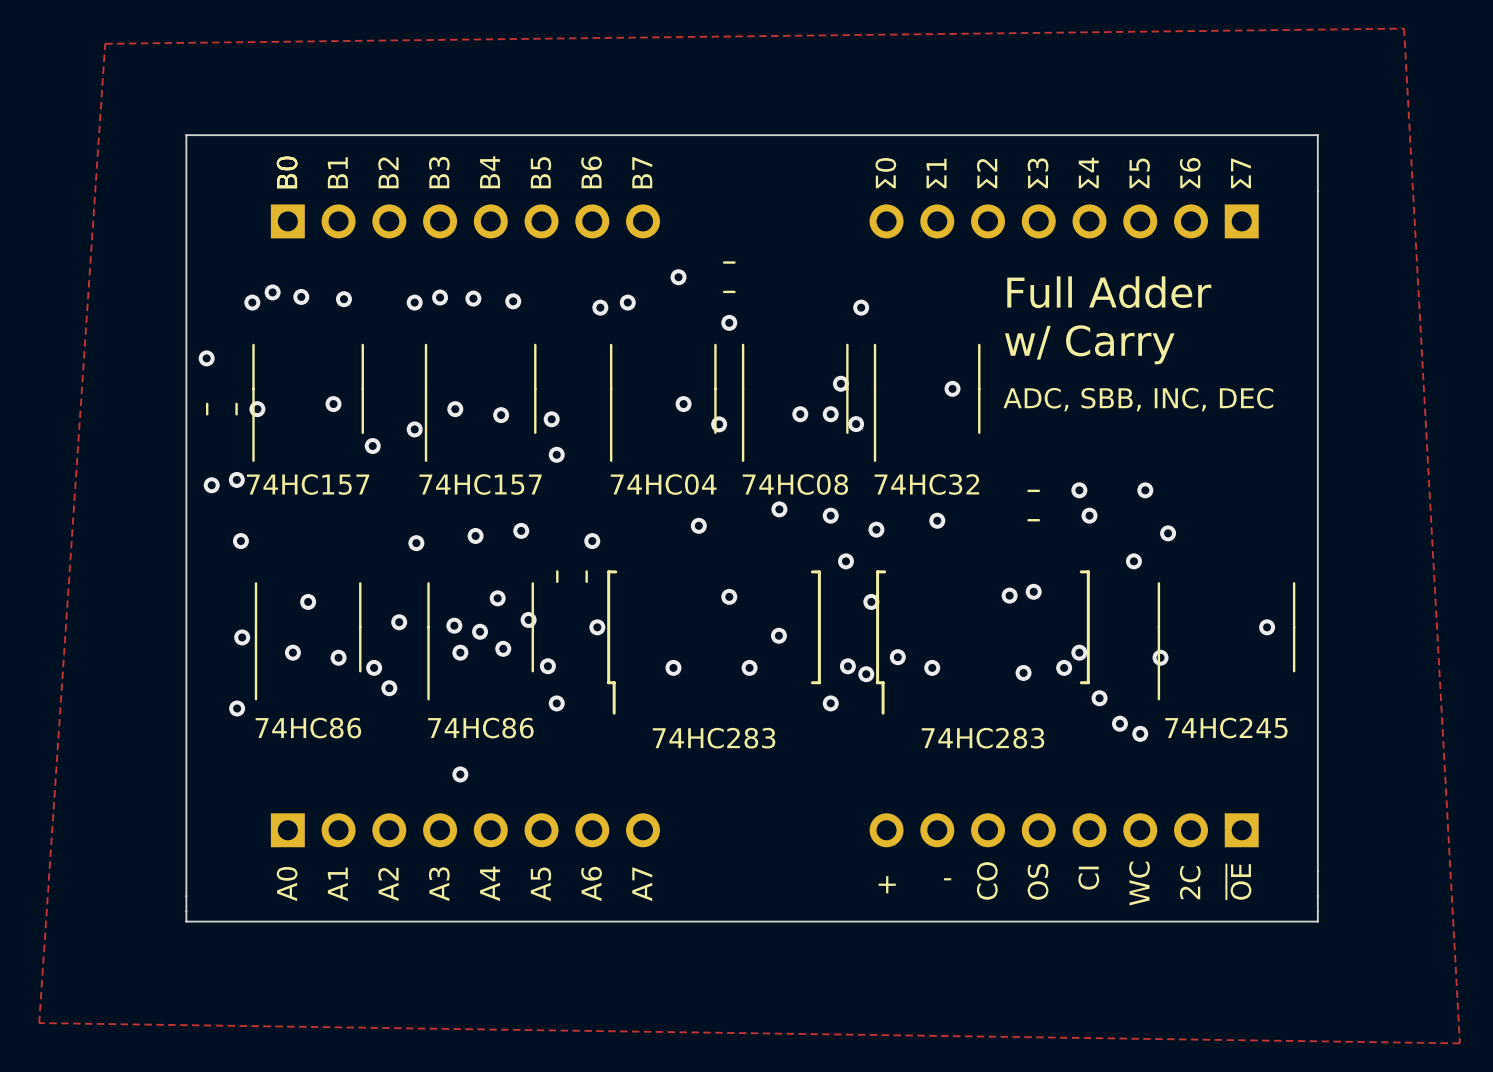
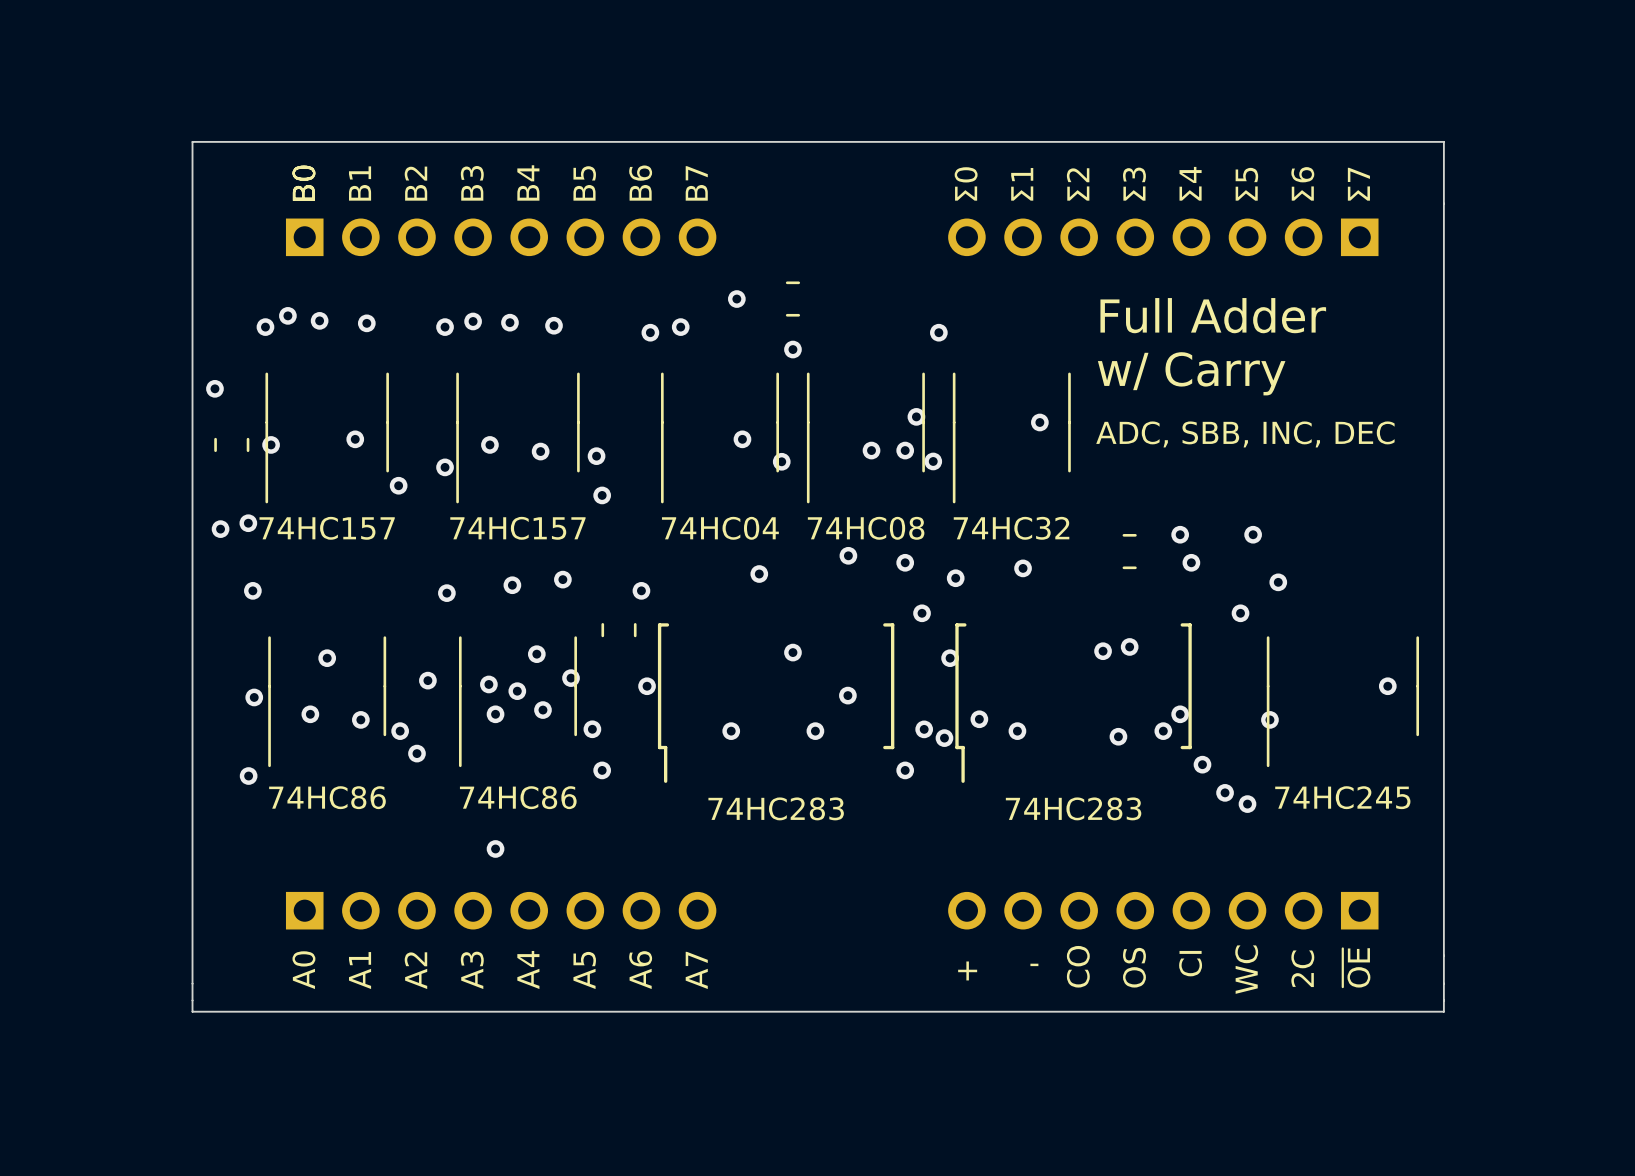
zone outline: (1404, 28) (105, 43) (39, 1023) (1459, 1043) (1404, 28) -> none

